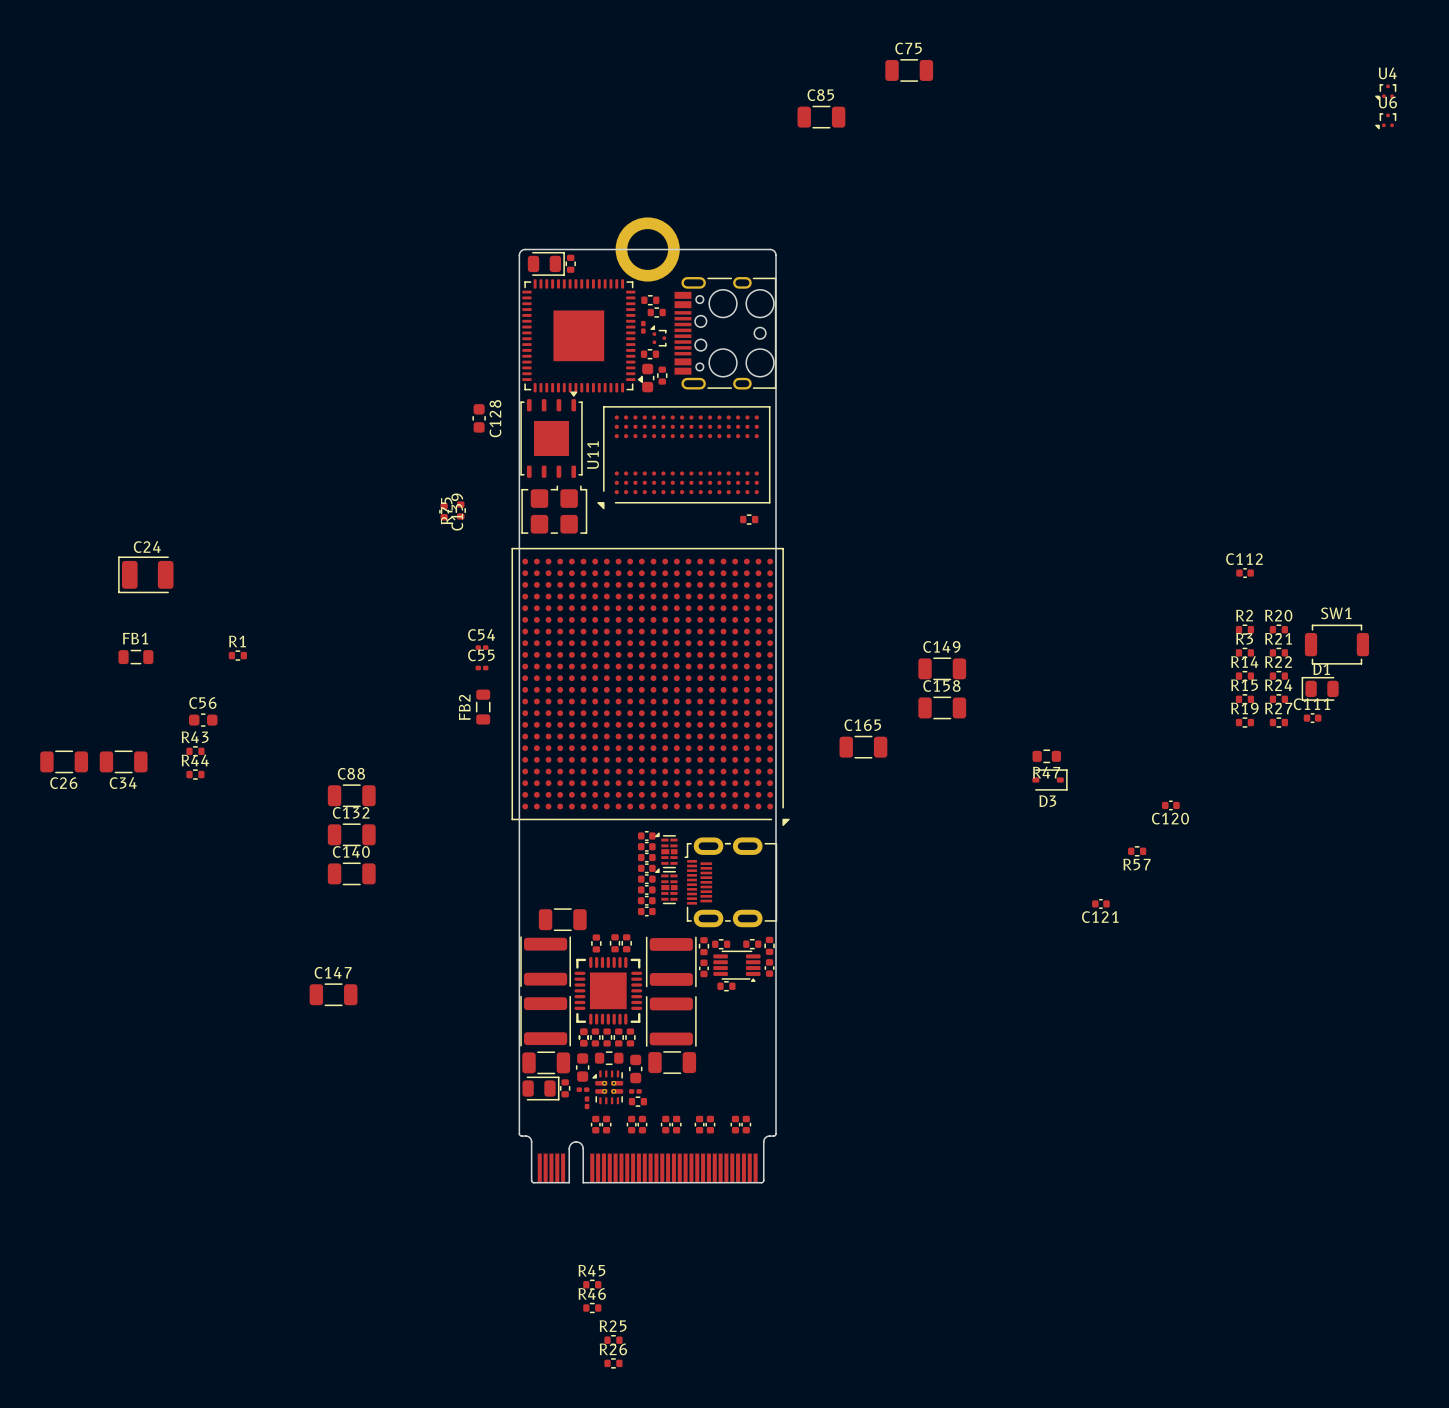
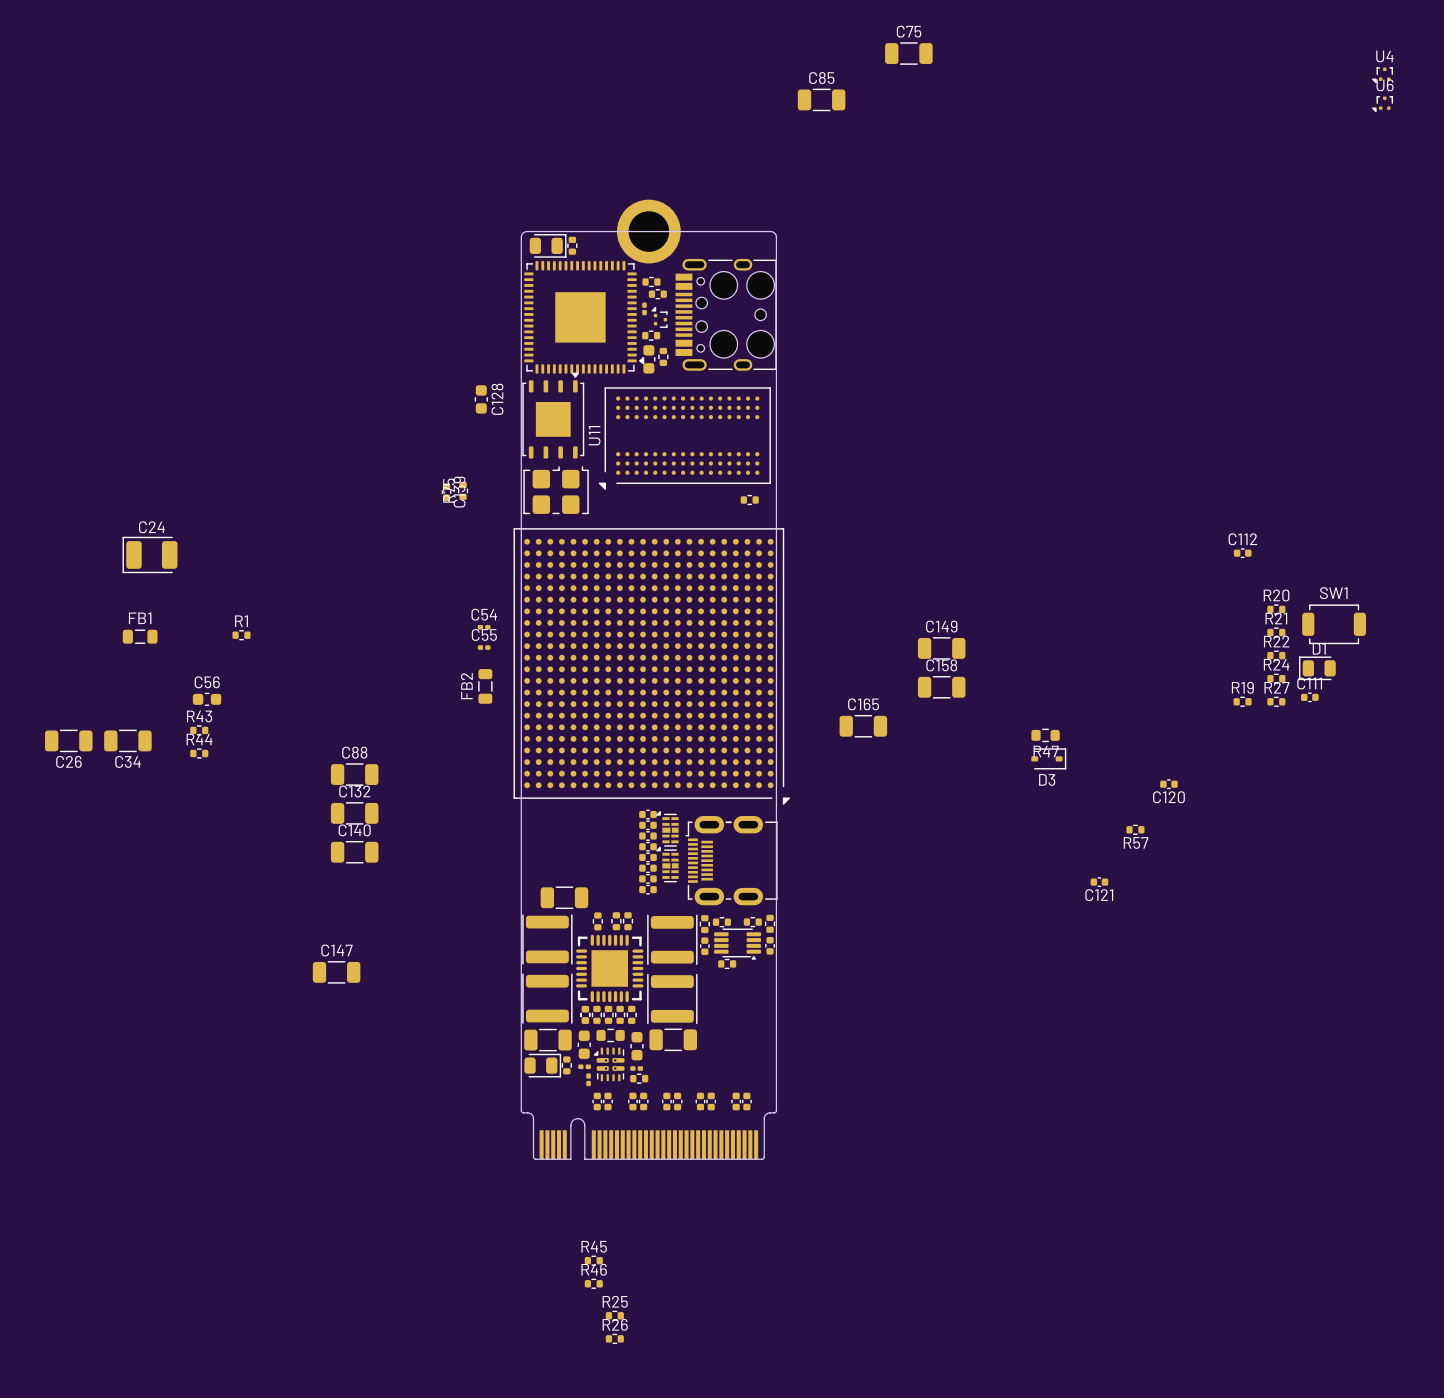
R2: (1244, 629) -> none
R3: (1244, 652) -> none
R14: (1244, 676) -> none
R15: (1244, 699) -> none

